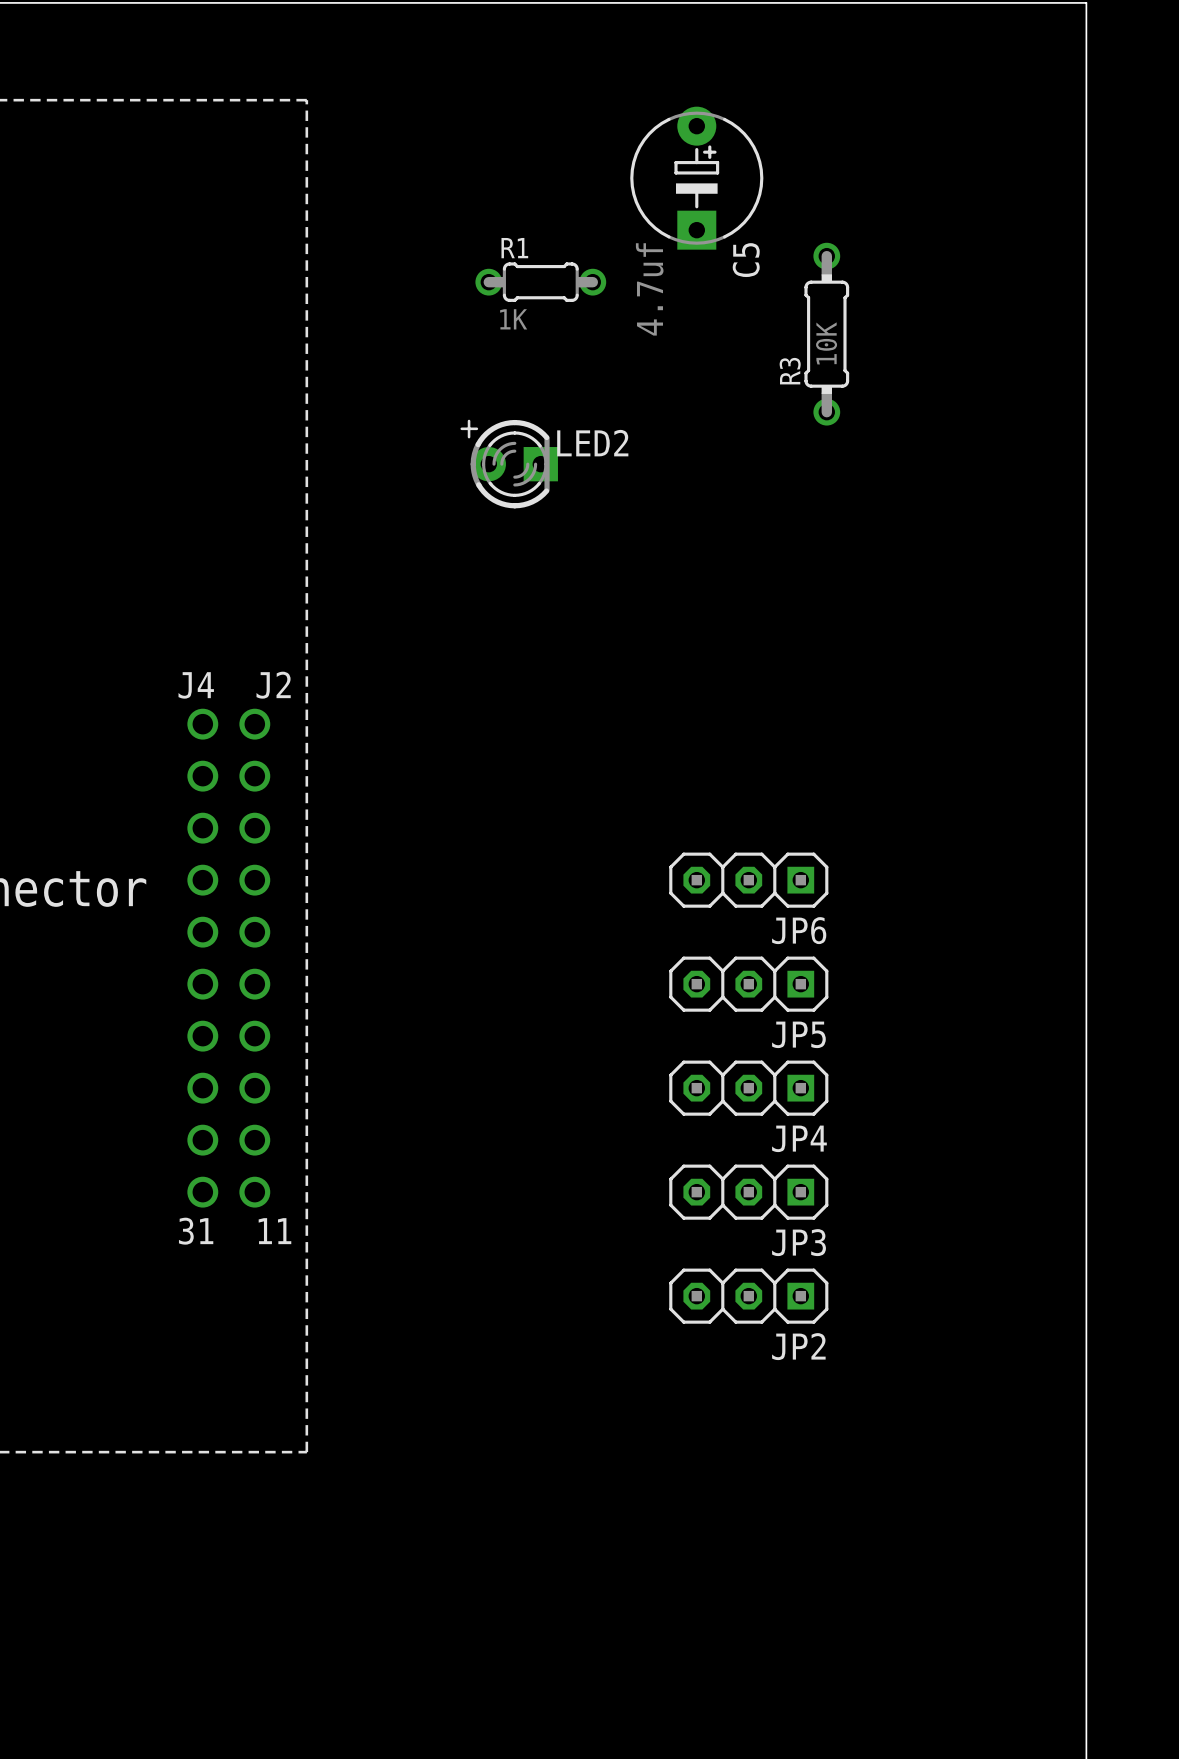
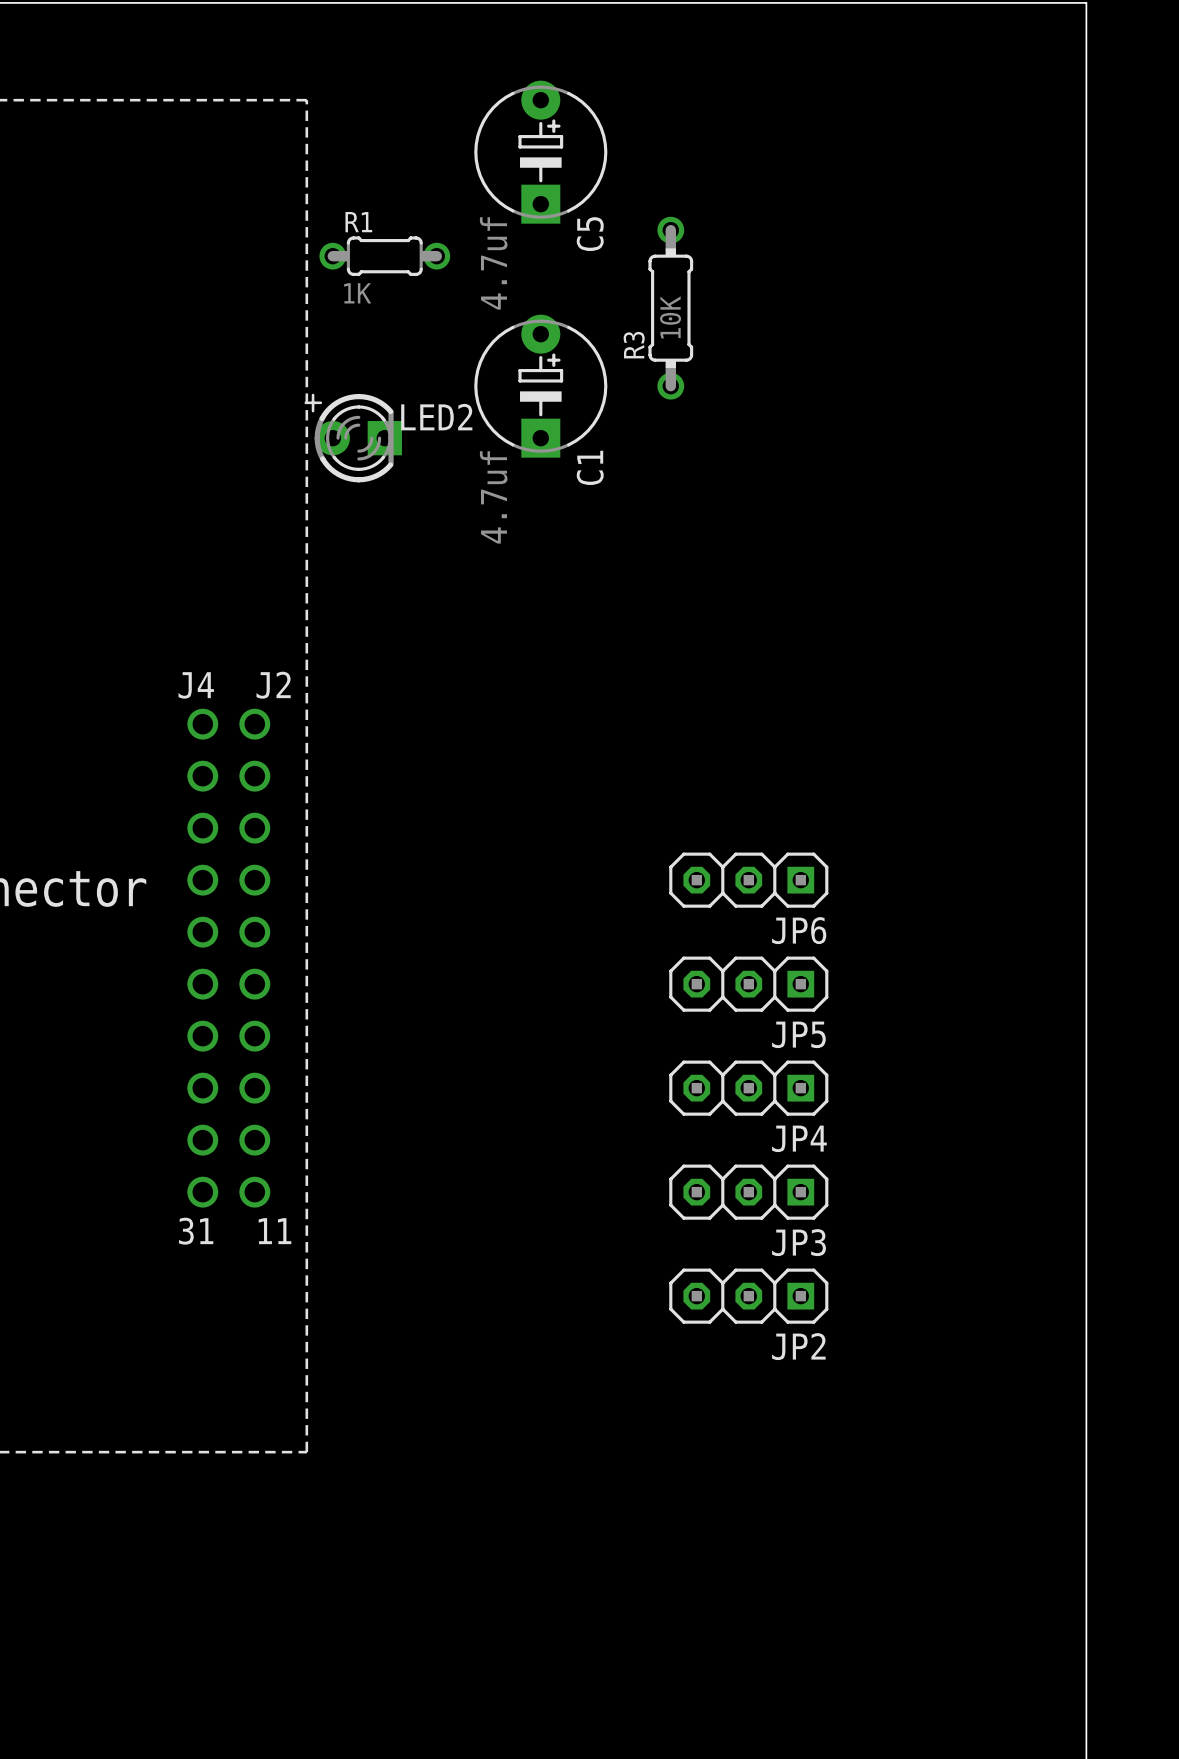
C5 position: (696, 178) -> (540, 152)
R1 position: (540, 282) -> (384, 256)
R3 position: (826, 334) -> (670, 308)
C1: none -> 4.7uf (540, 386)
LED2 position: (509, 464) -> (353, 438)

